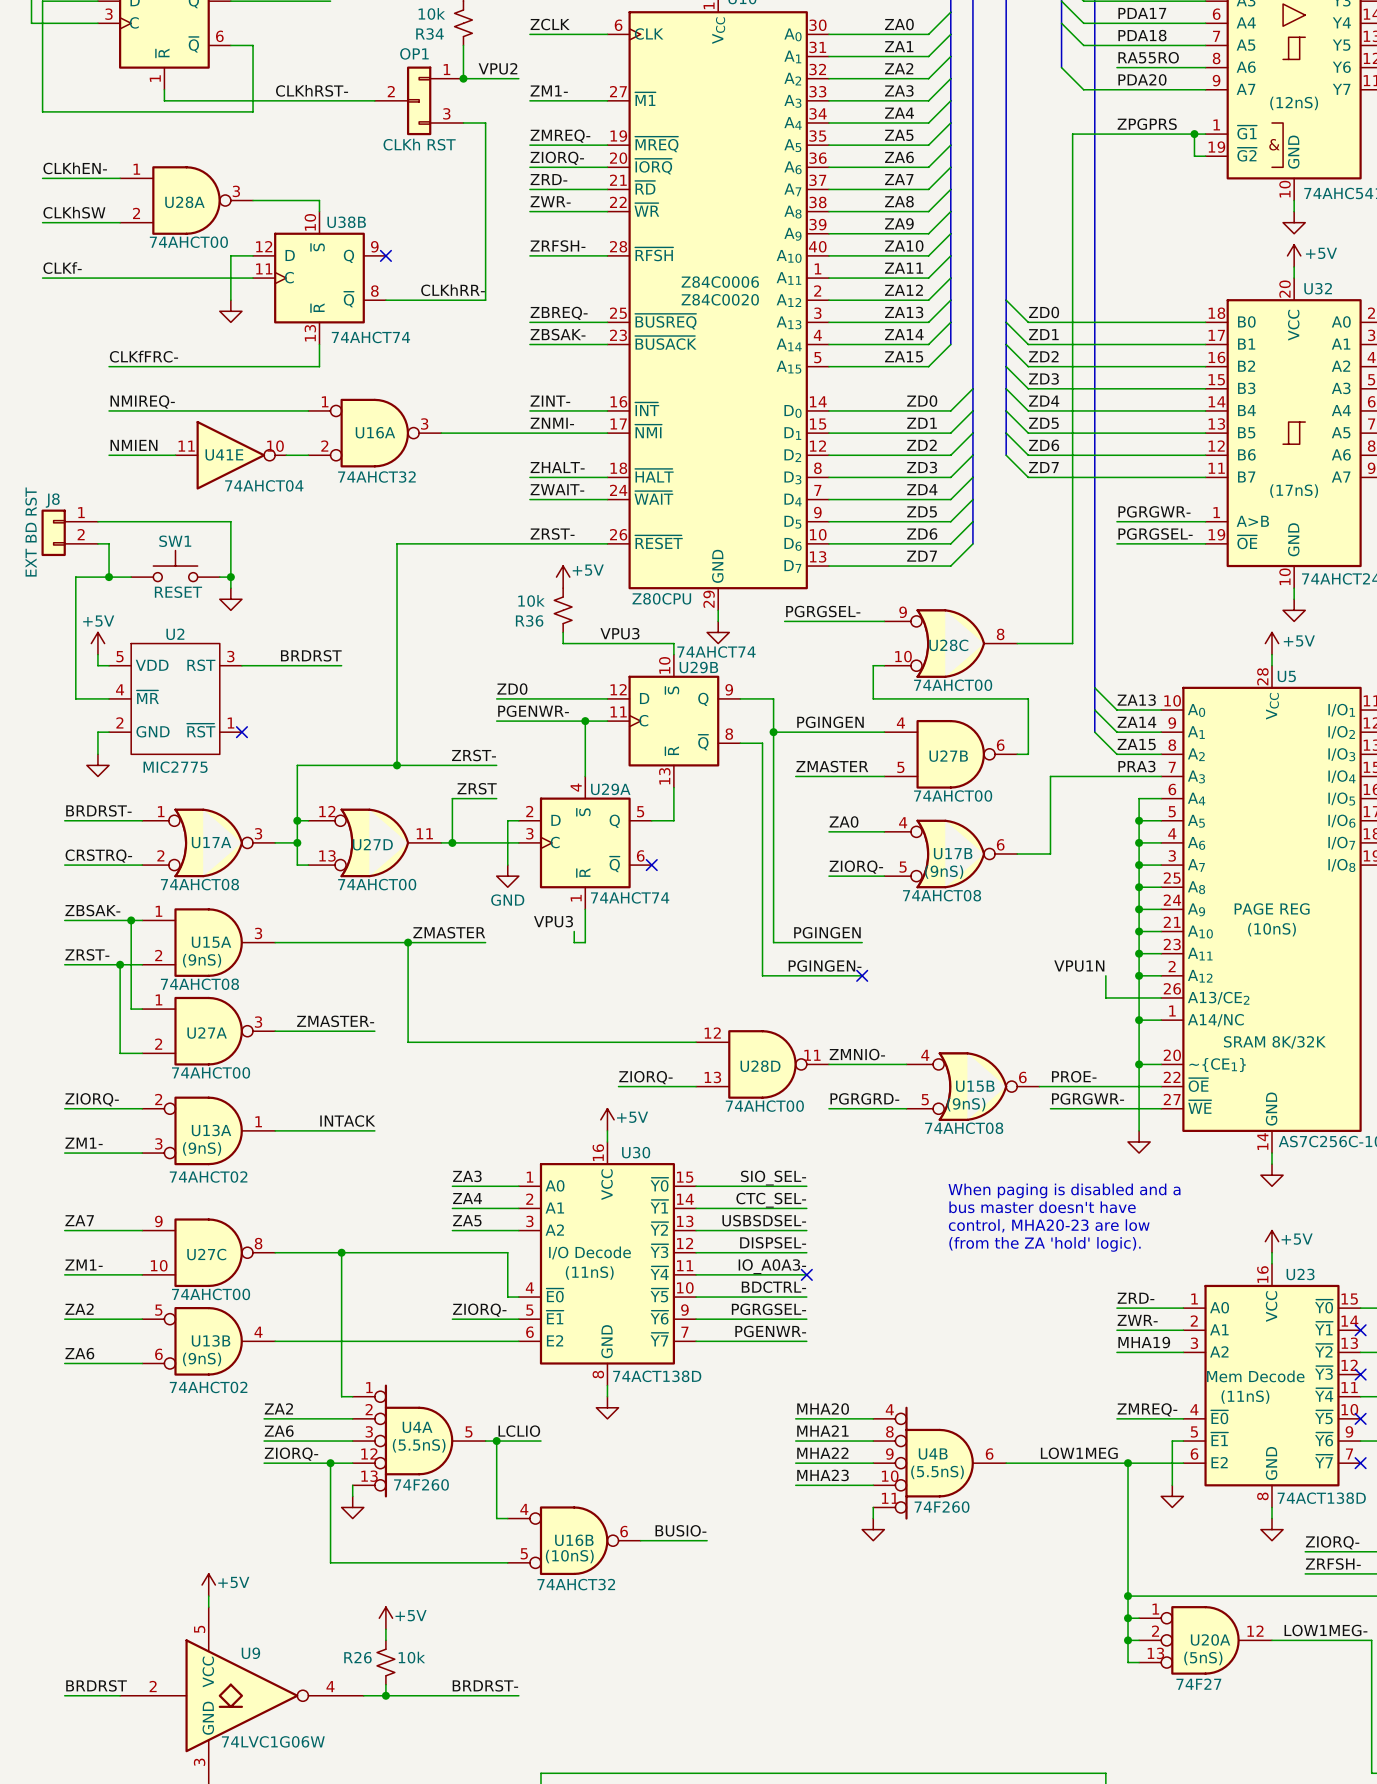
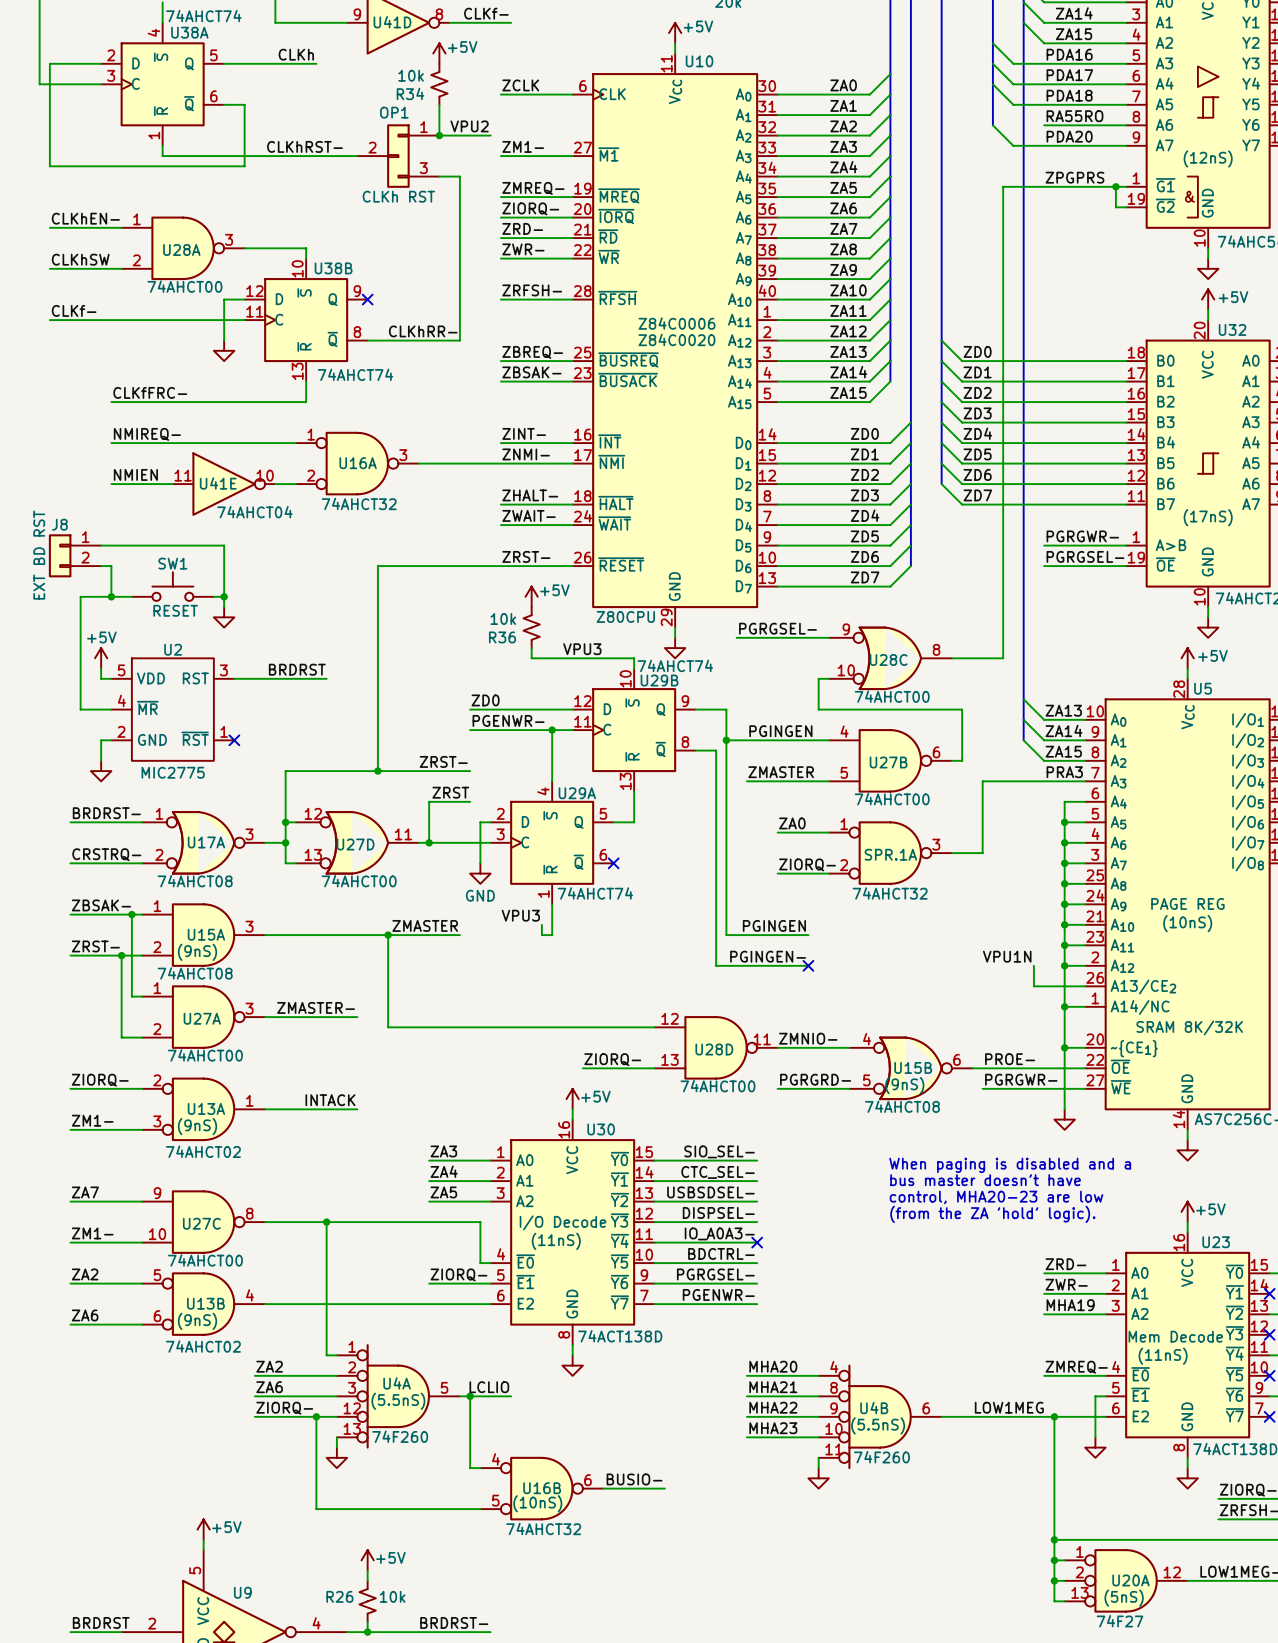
U17B: 74AHCT08 (950, 854) -> none
SPR.1A: none -> 74AHCT32 (890, 853)

